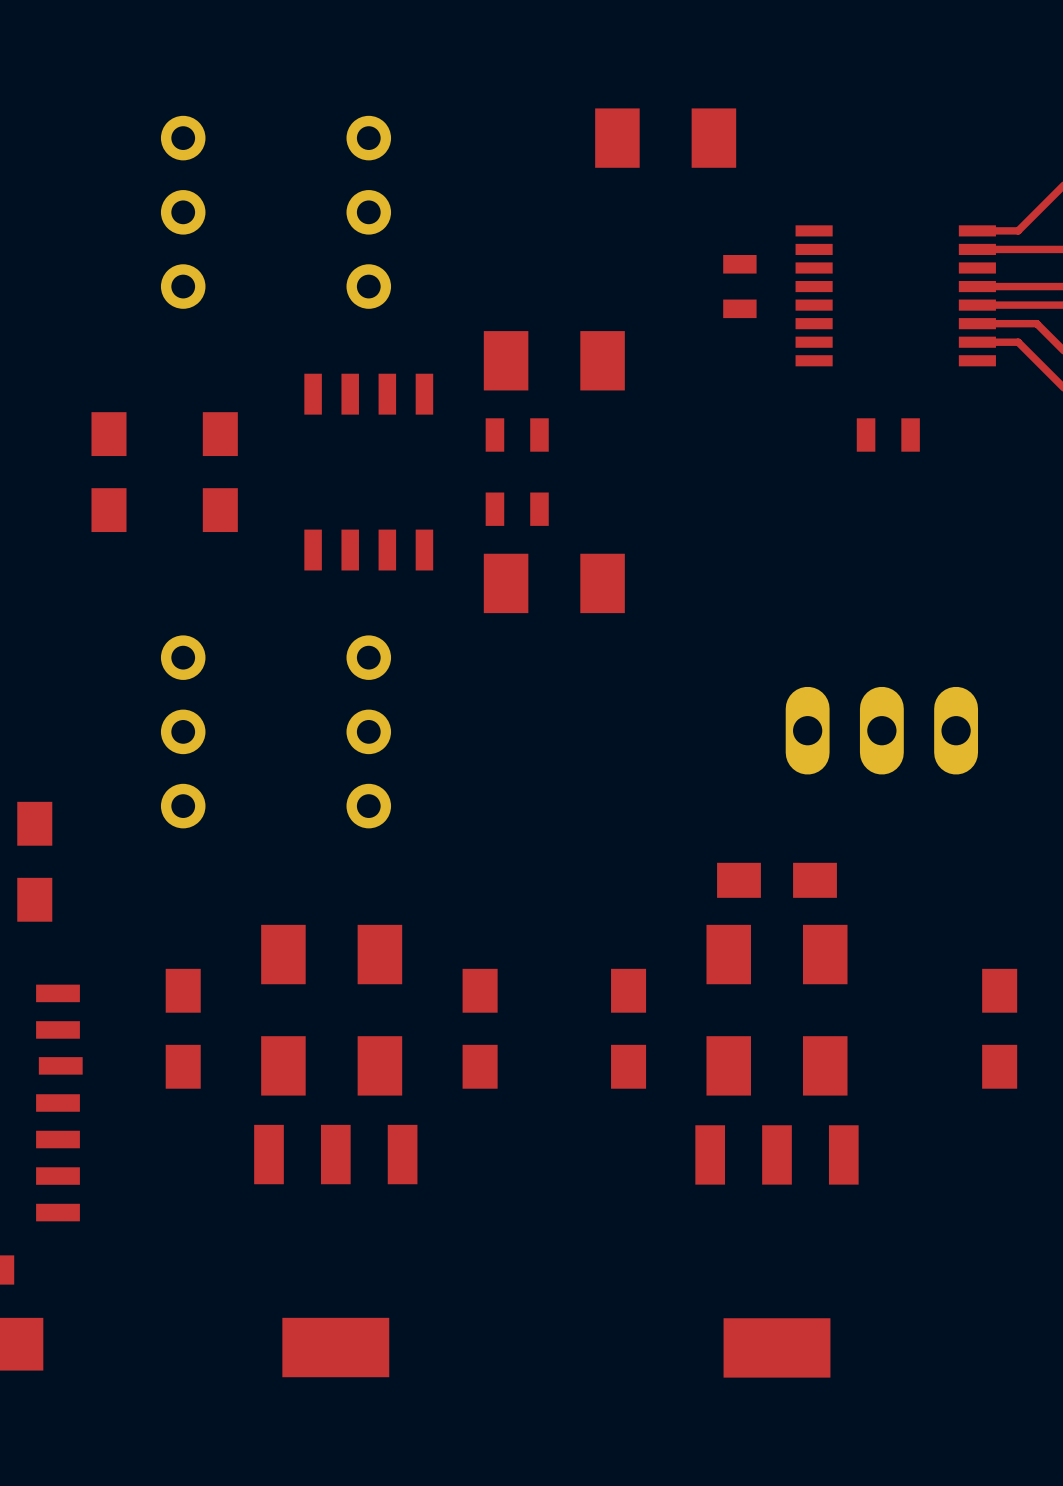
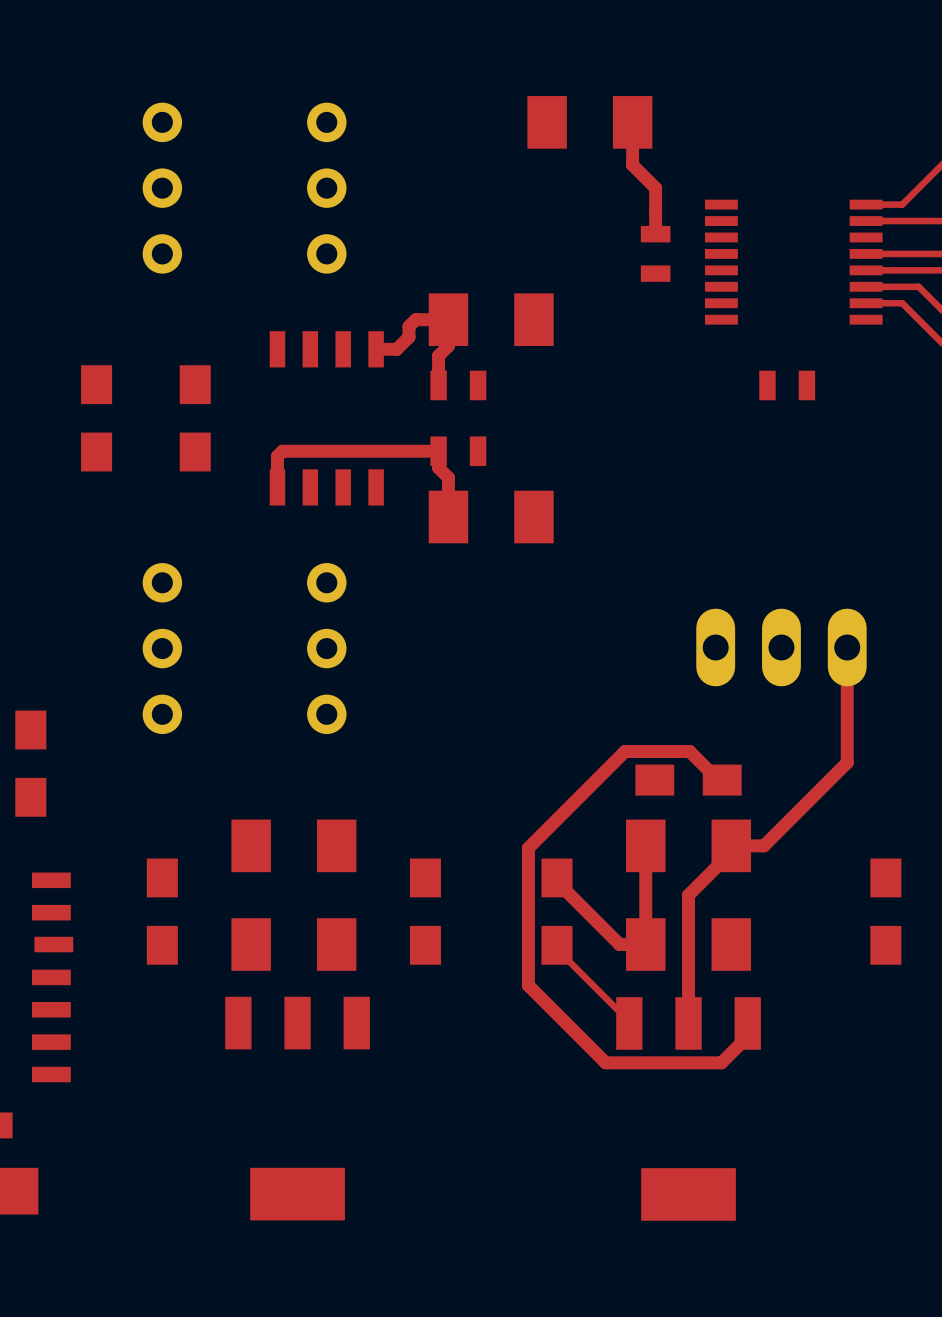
top track: none -> (632, 122) (632, 165) (655, 188) (655, 234)
top track: none -> (376, 349) (396, 349) (409, 337) (409, 326) (415, 319) (448, 319) (448, 346) (438, 355) (438, 385)
top track: none -> (277, 487) (277, 456) (282, 451) (438, 451) (438, 467) (448, 477) (448, 517)
top track: none -> (847, 647) (847, 762) (763, 845) (731, 845) (731, 852) (688, 895) (688, 1023)
top track: none -> (722, 780) (718, 780) (689, 751) (624, 751) (528, 848) (528, 985) (605, 1062) (721, 1062) (747, 1036) (747, 1023)
top track: none -> (645, 845) (645, 944) (619, 944) (556, 881) (556, 877)
top track: none -> (556, 945) (556, 949) (629, 1023)

